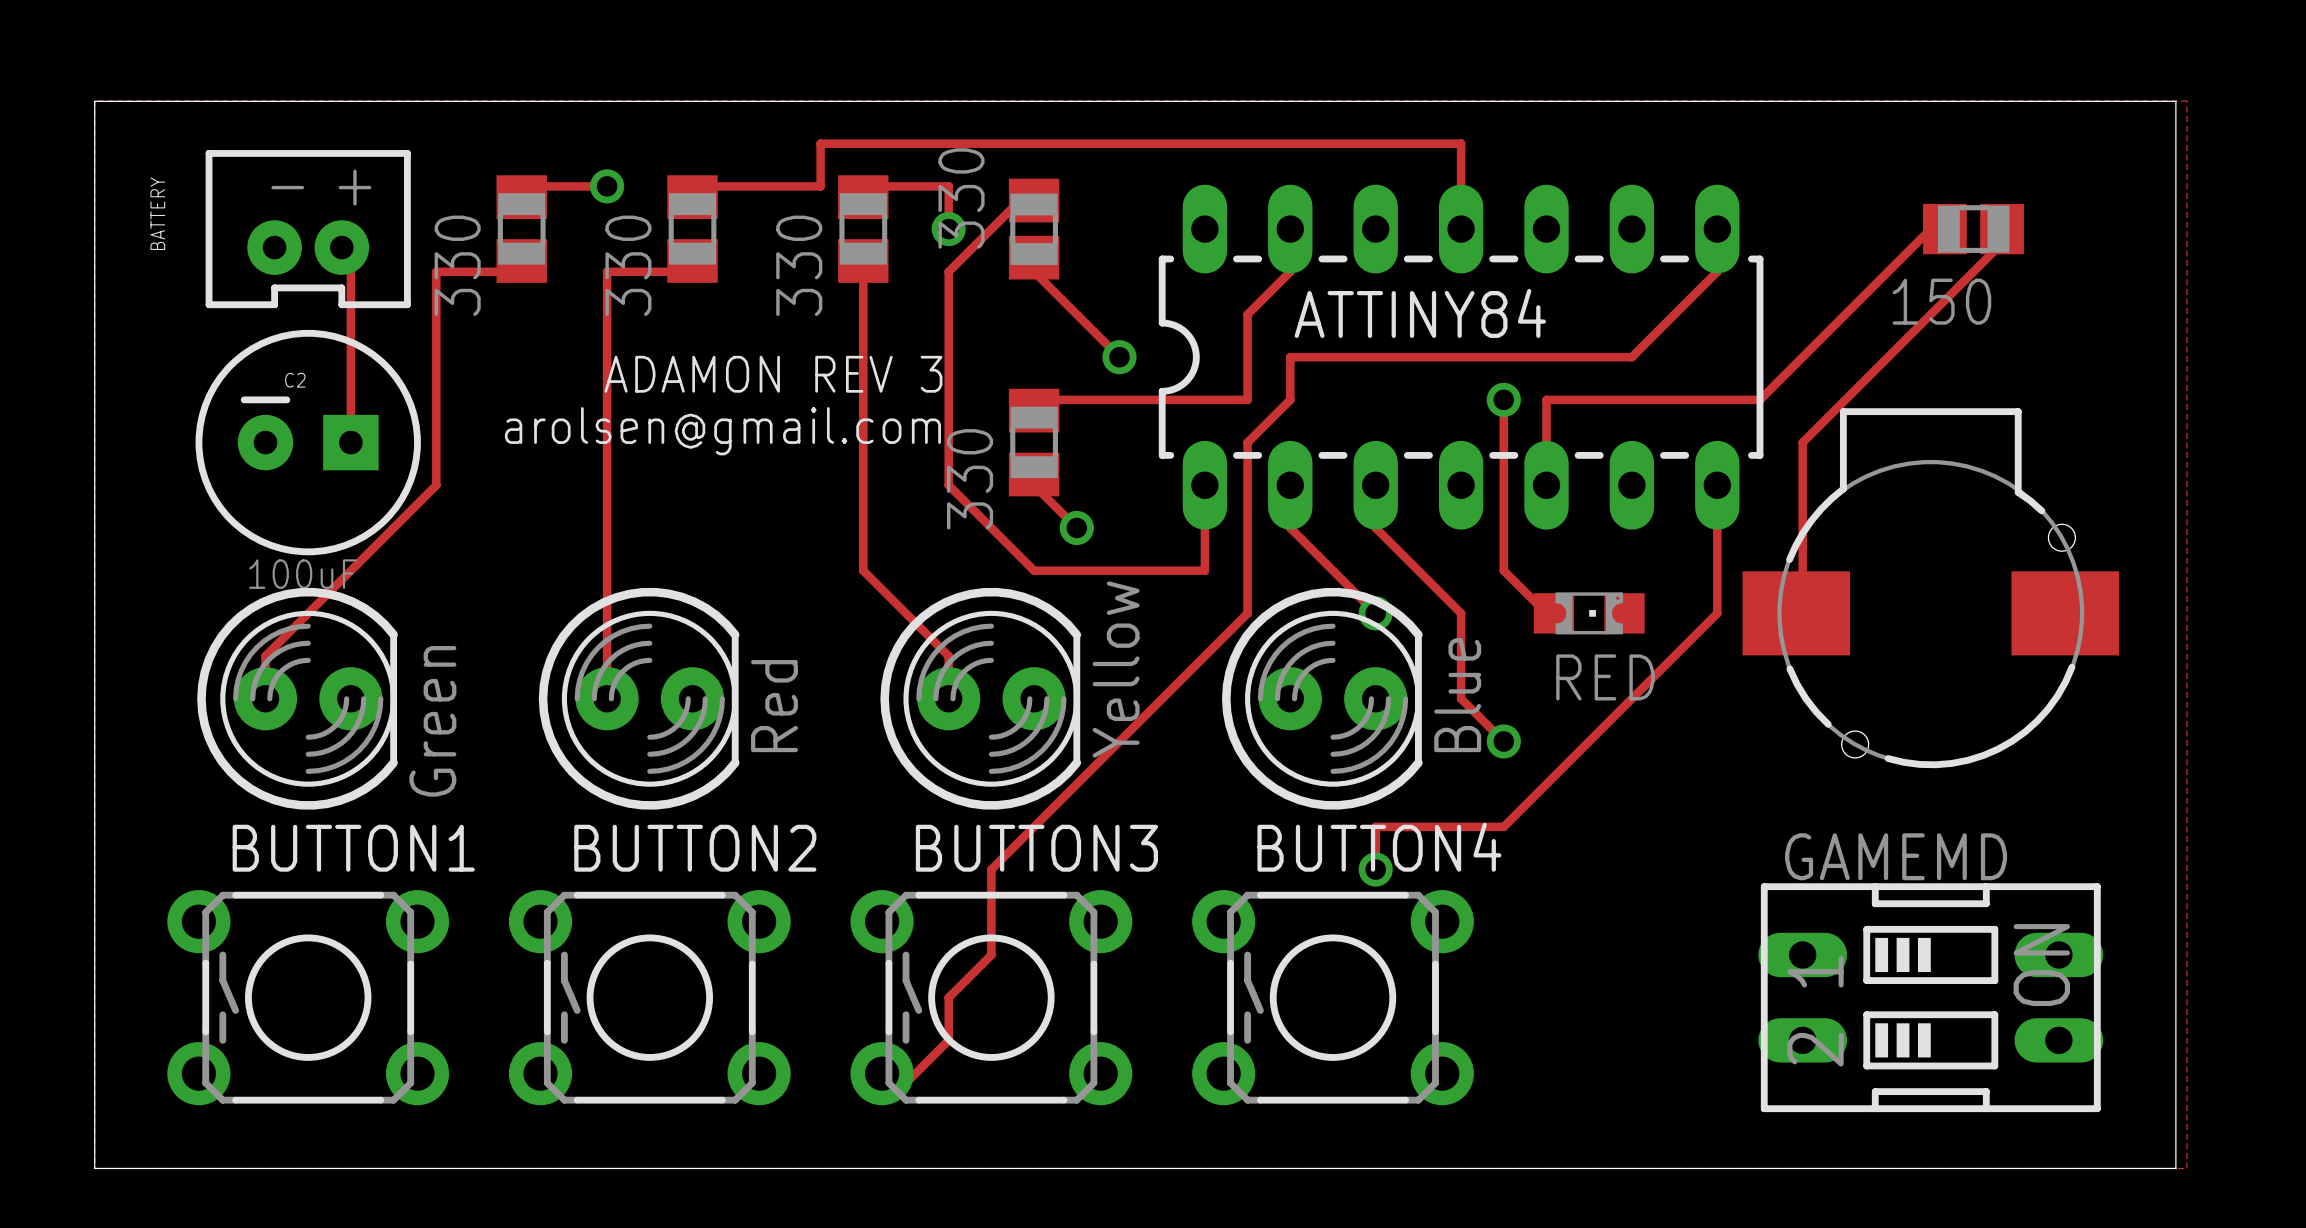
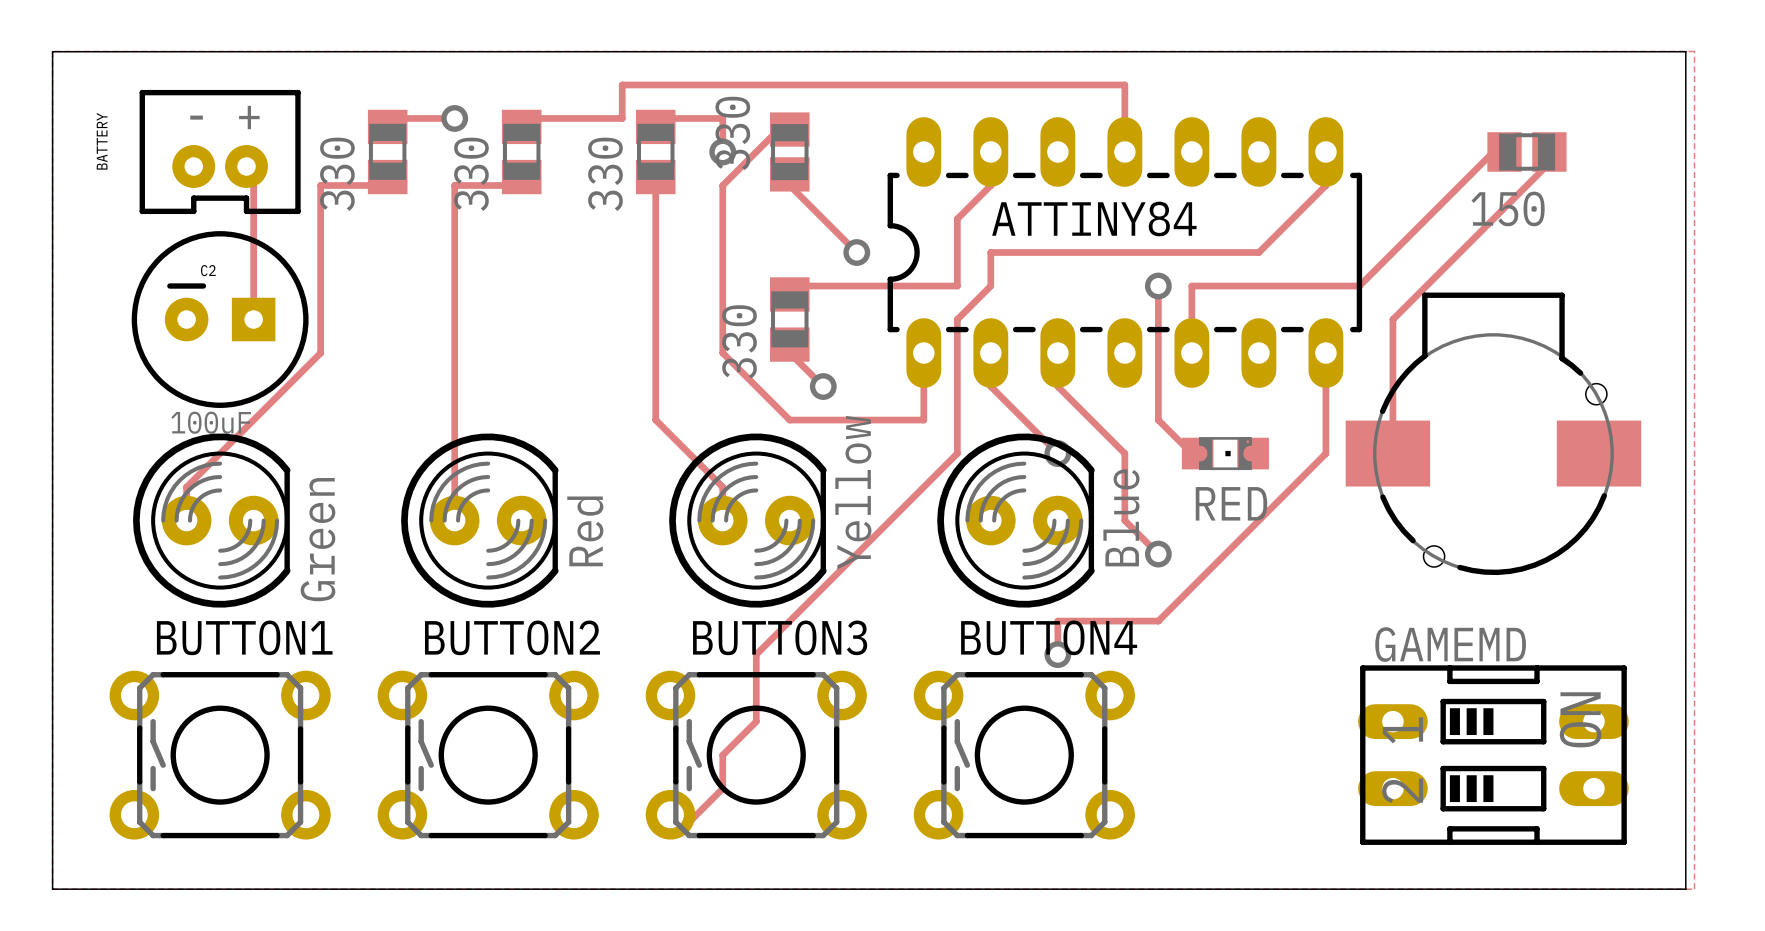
text: ADAMON REV 3 (773, 374) -> none
text: arolsen@gmail.com (722, 431) -> none

